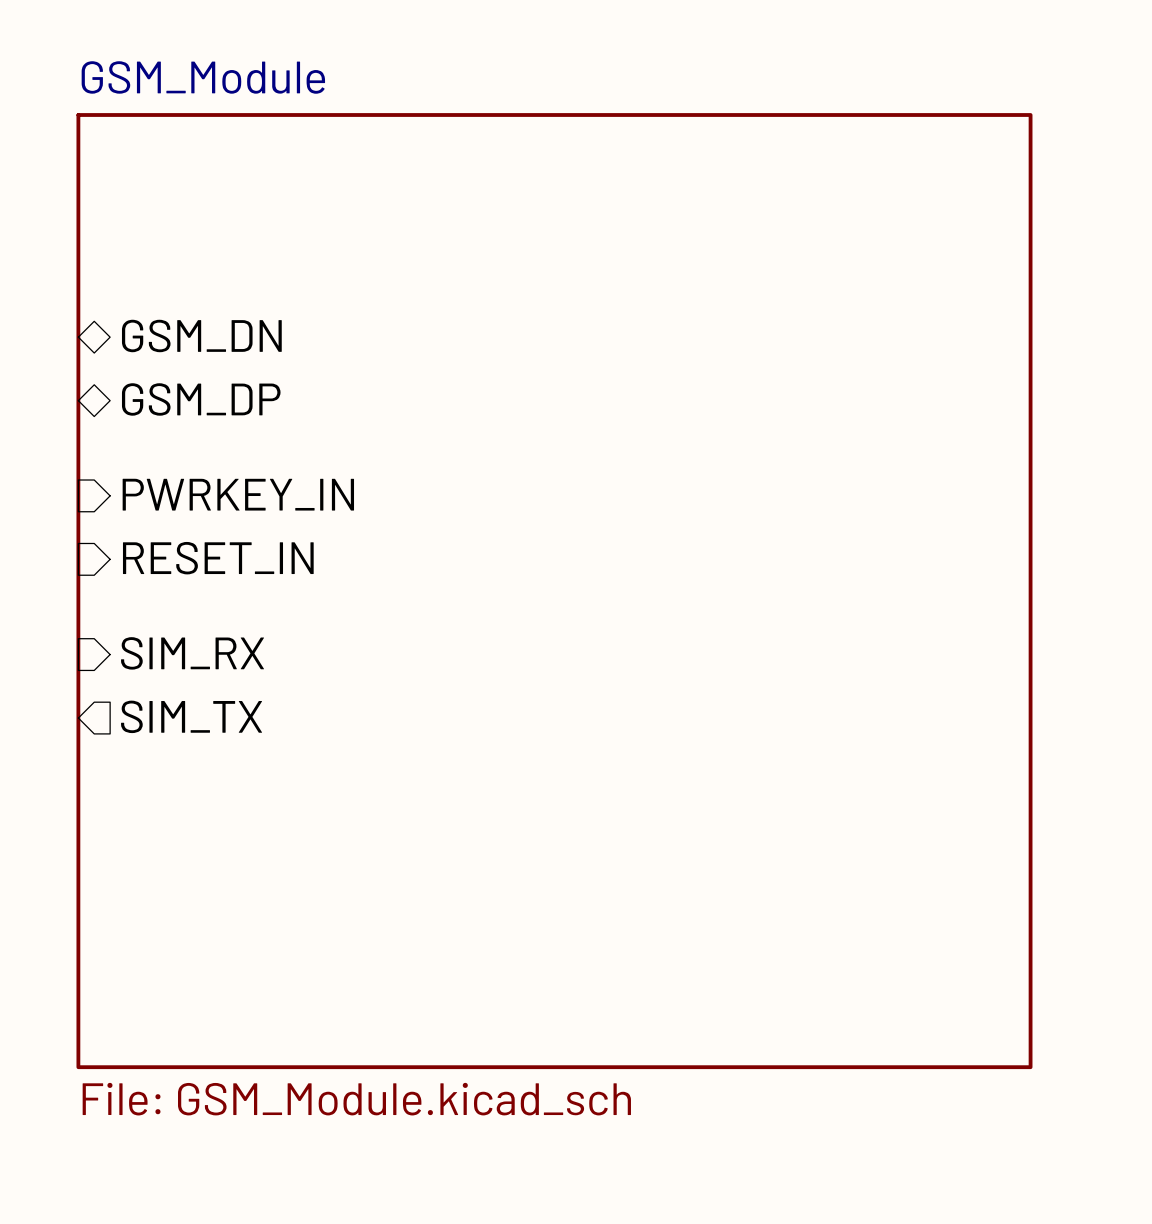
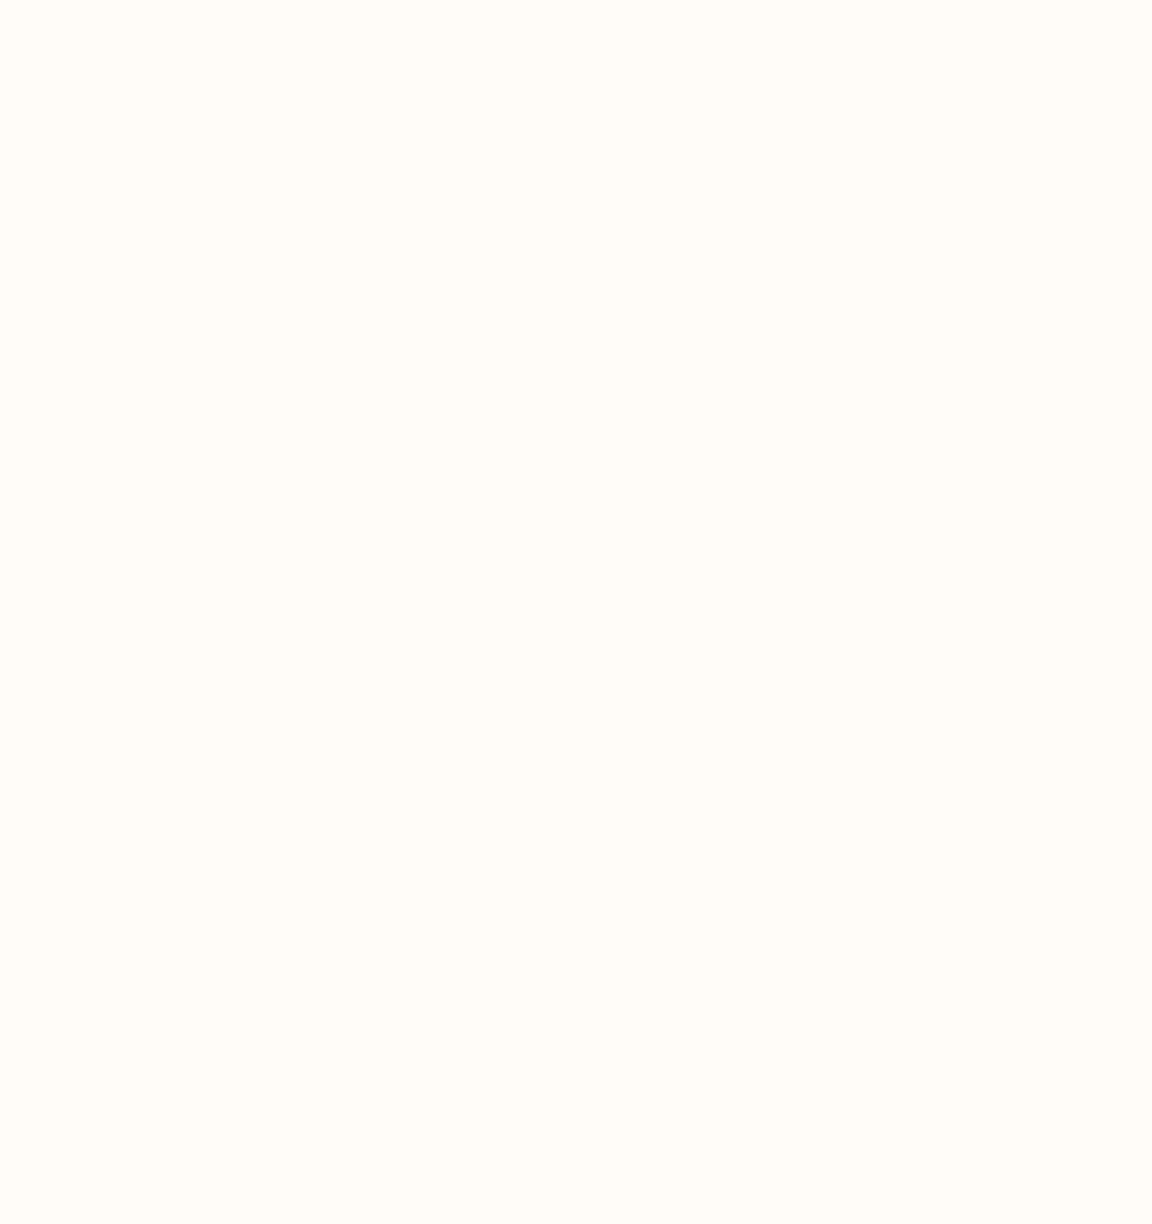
sheet pin: GSM_DN (201, 335) -> none
sheet pin: GSM_DP (201, 399) -> none
sheet pin: PWRKEY_IN (238, 494) -> none
sheet pin: RESET_IN (218, 558) -> none
sheet GSM_Module: File: GSM_Module.kicad_sch (554, 591) -> none
sheet pin: SIM_RX (192, 653) -> none
sheet pin: SIM_TX (191, 716) -> none

